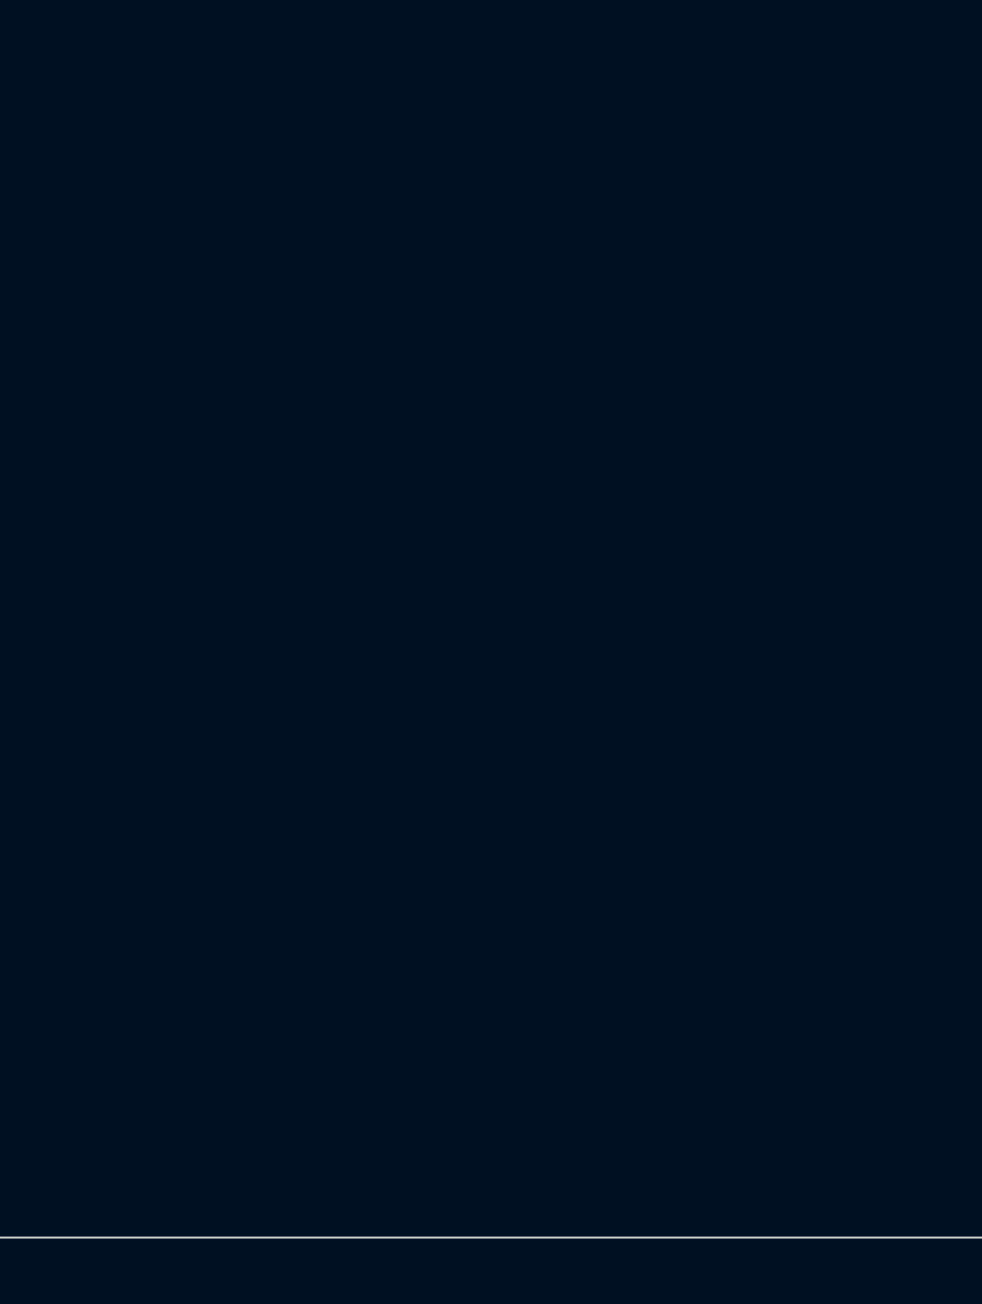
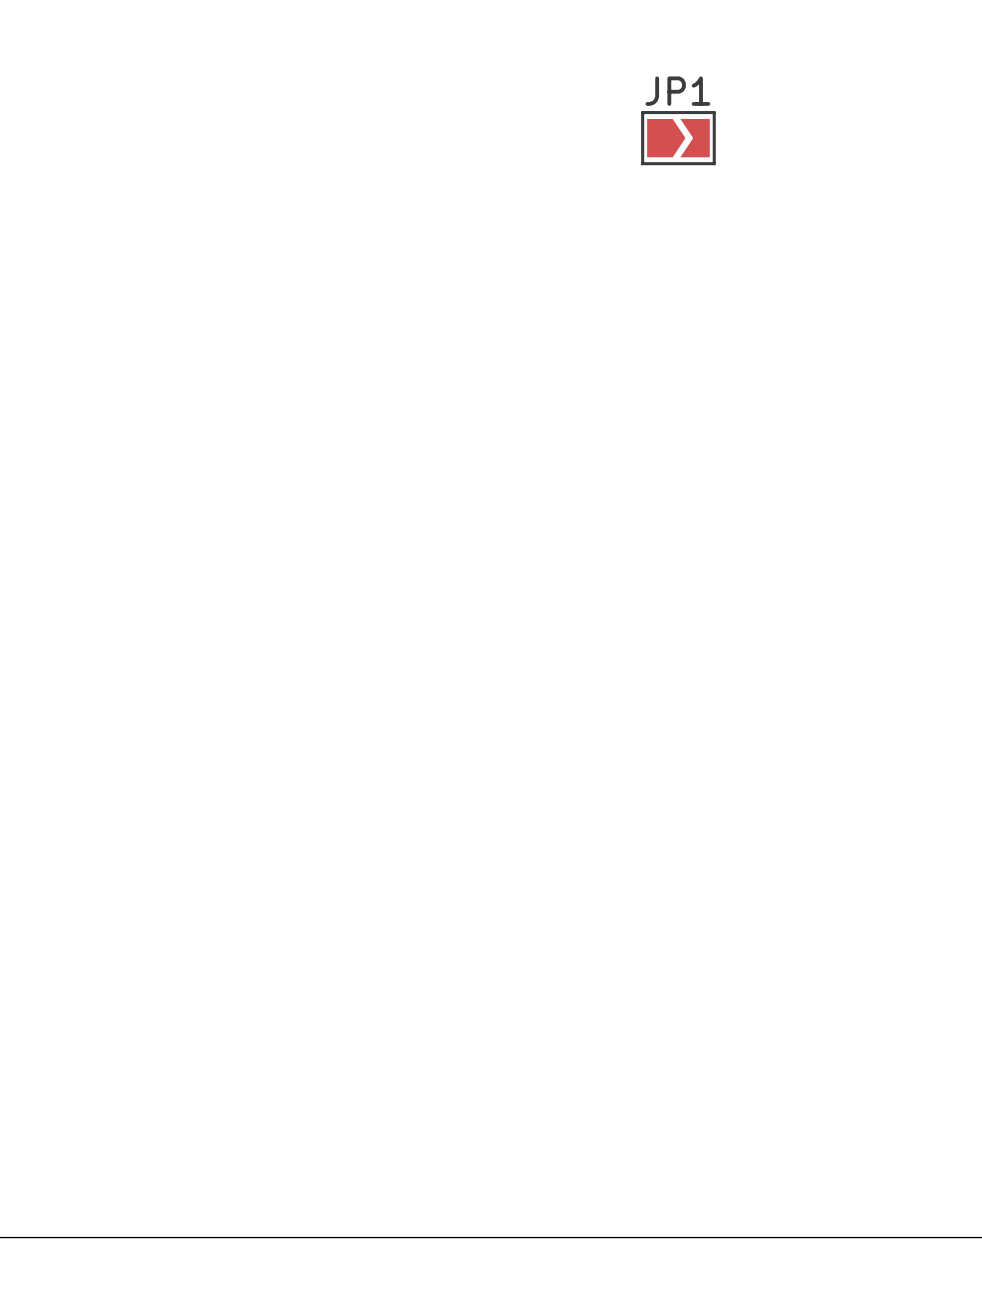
JP1: none -> (678, 138)

